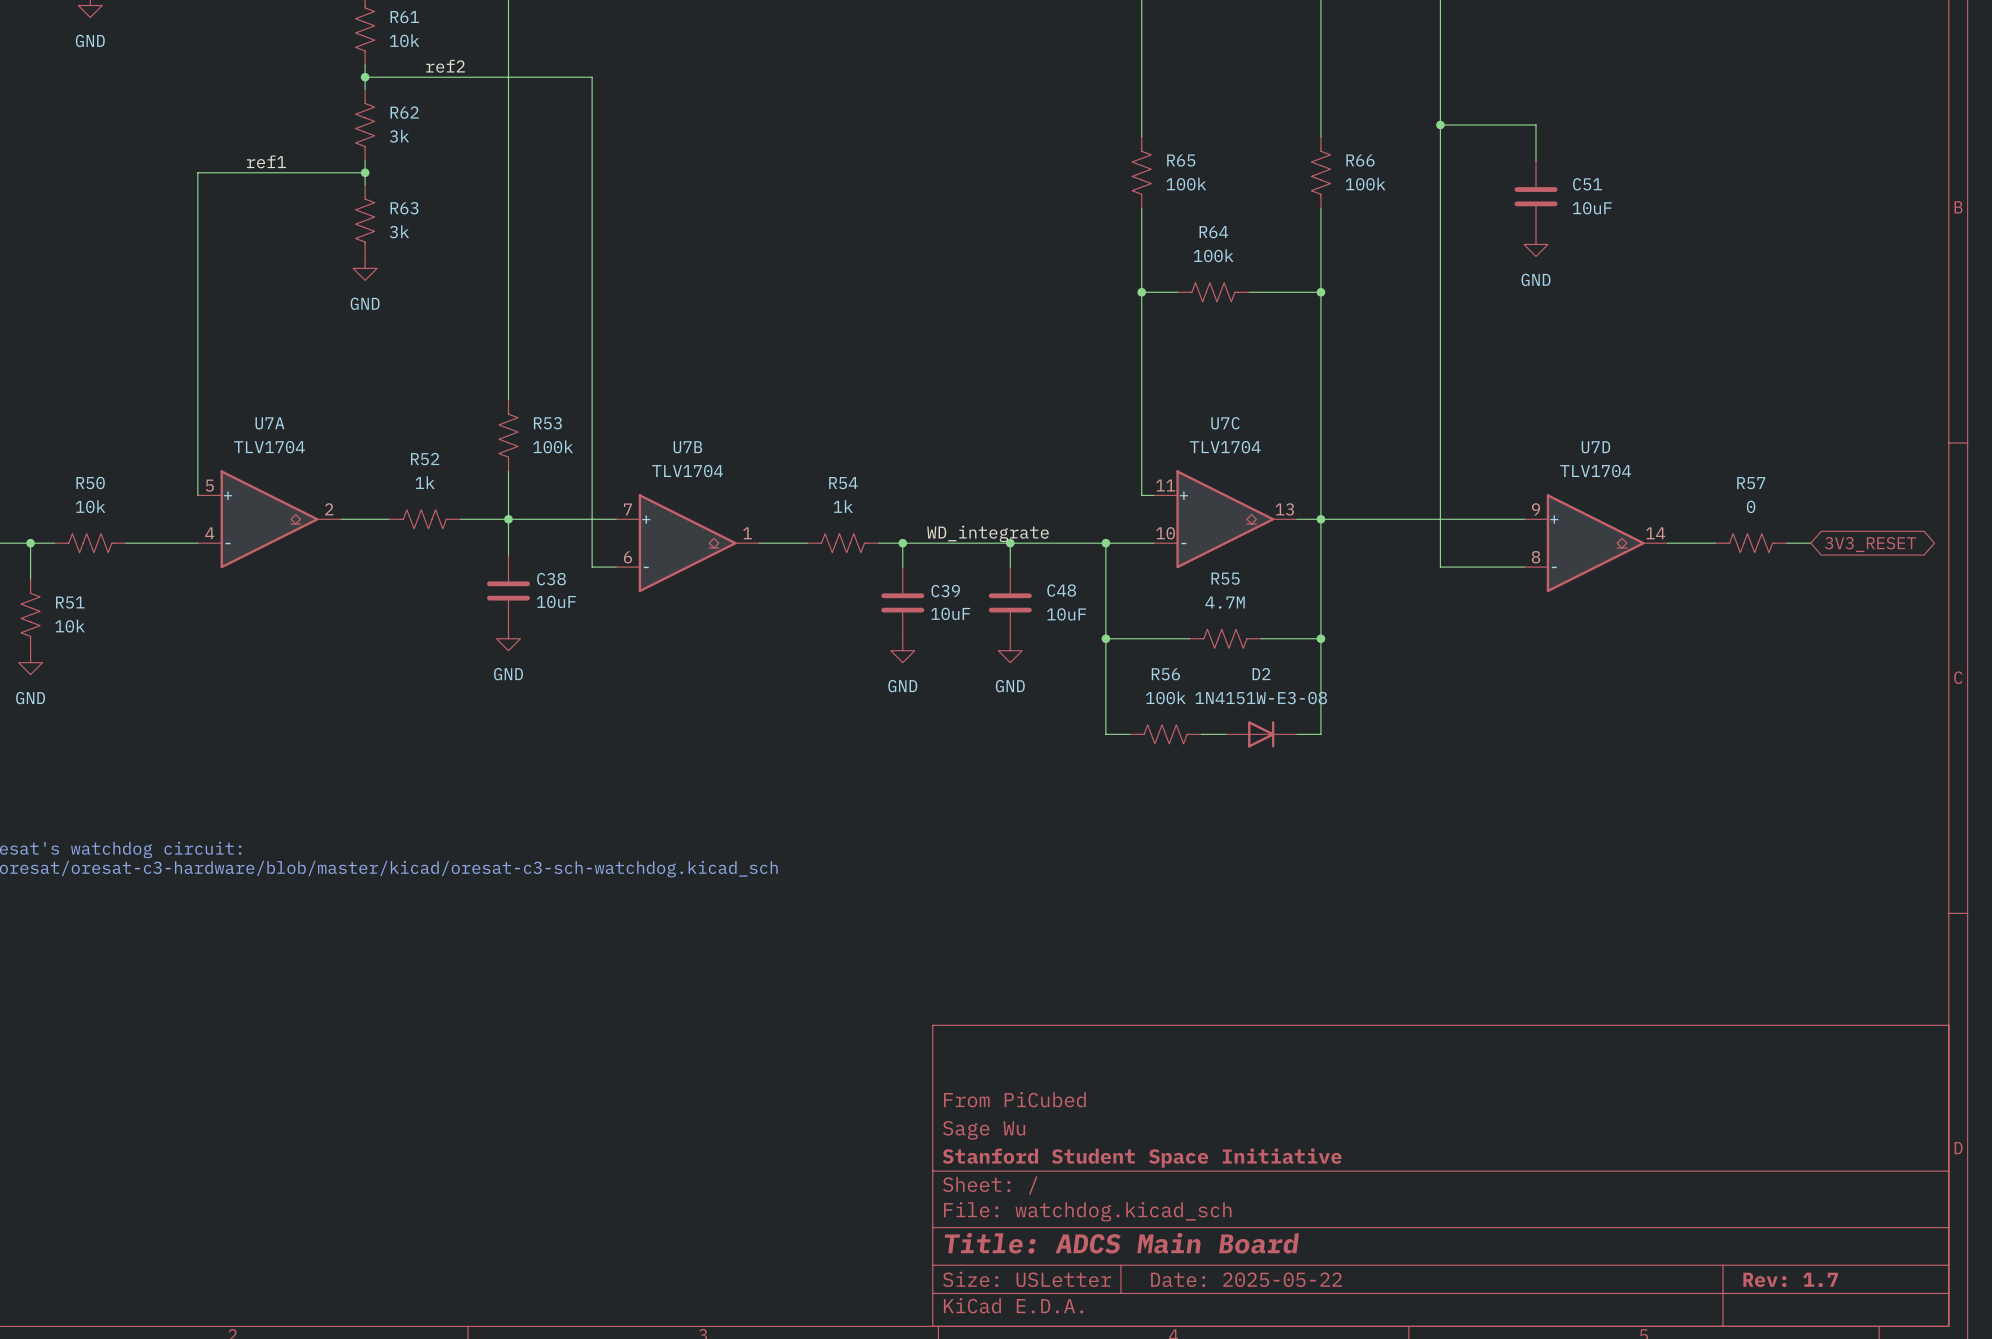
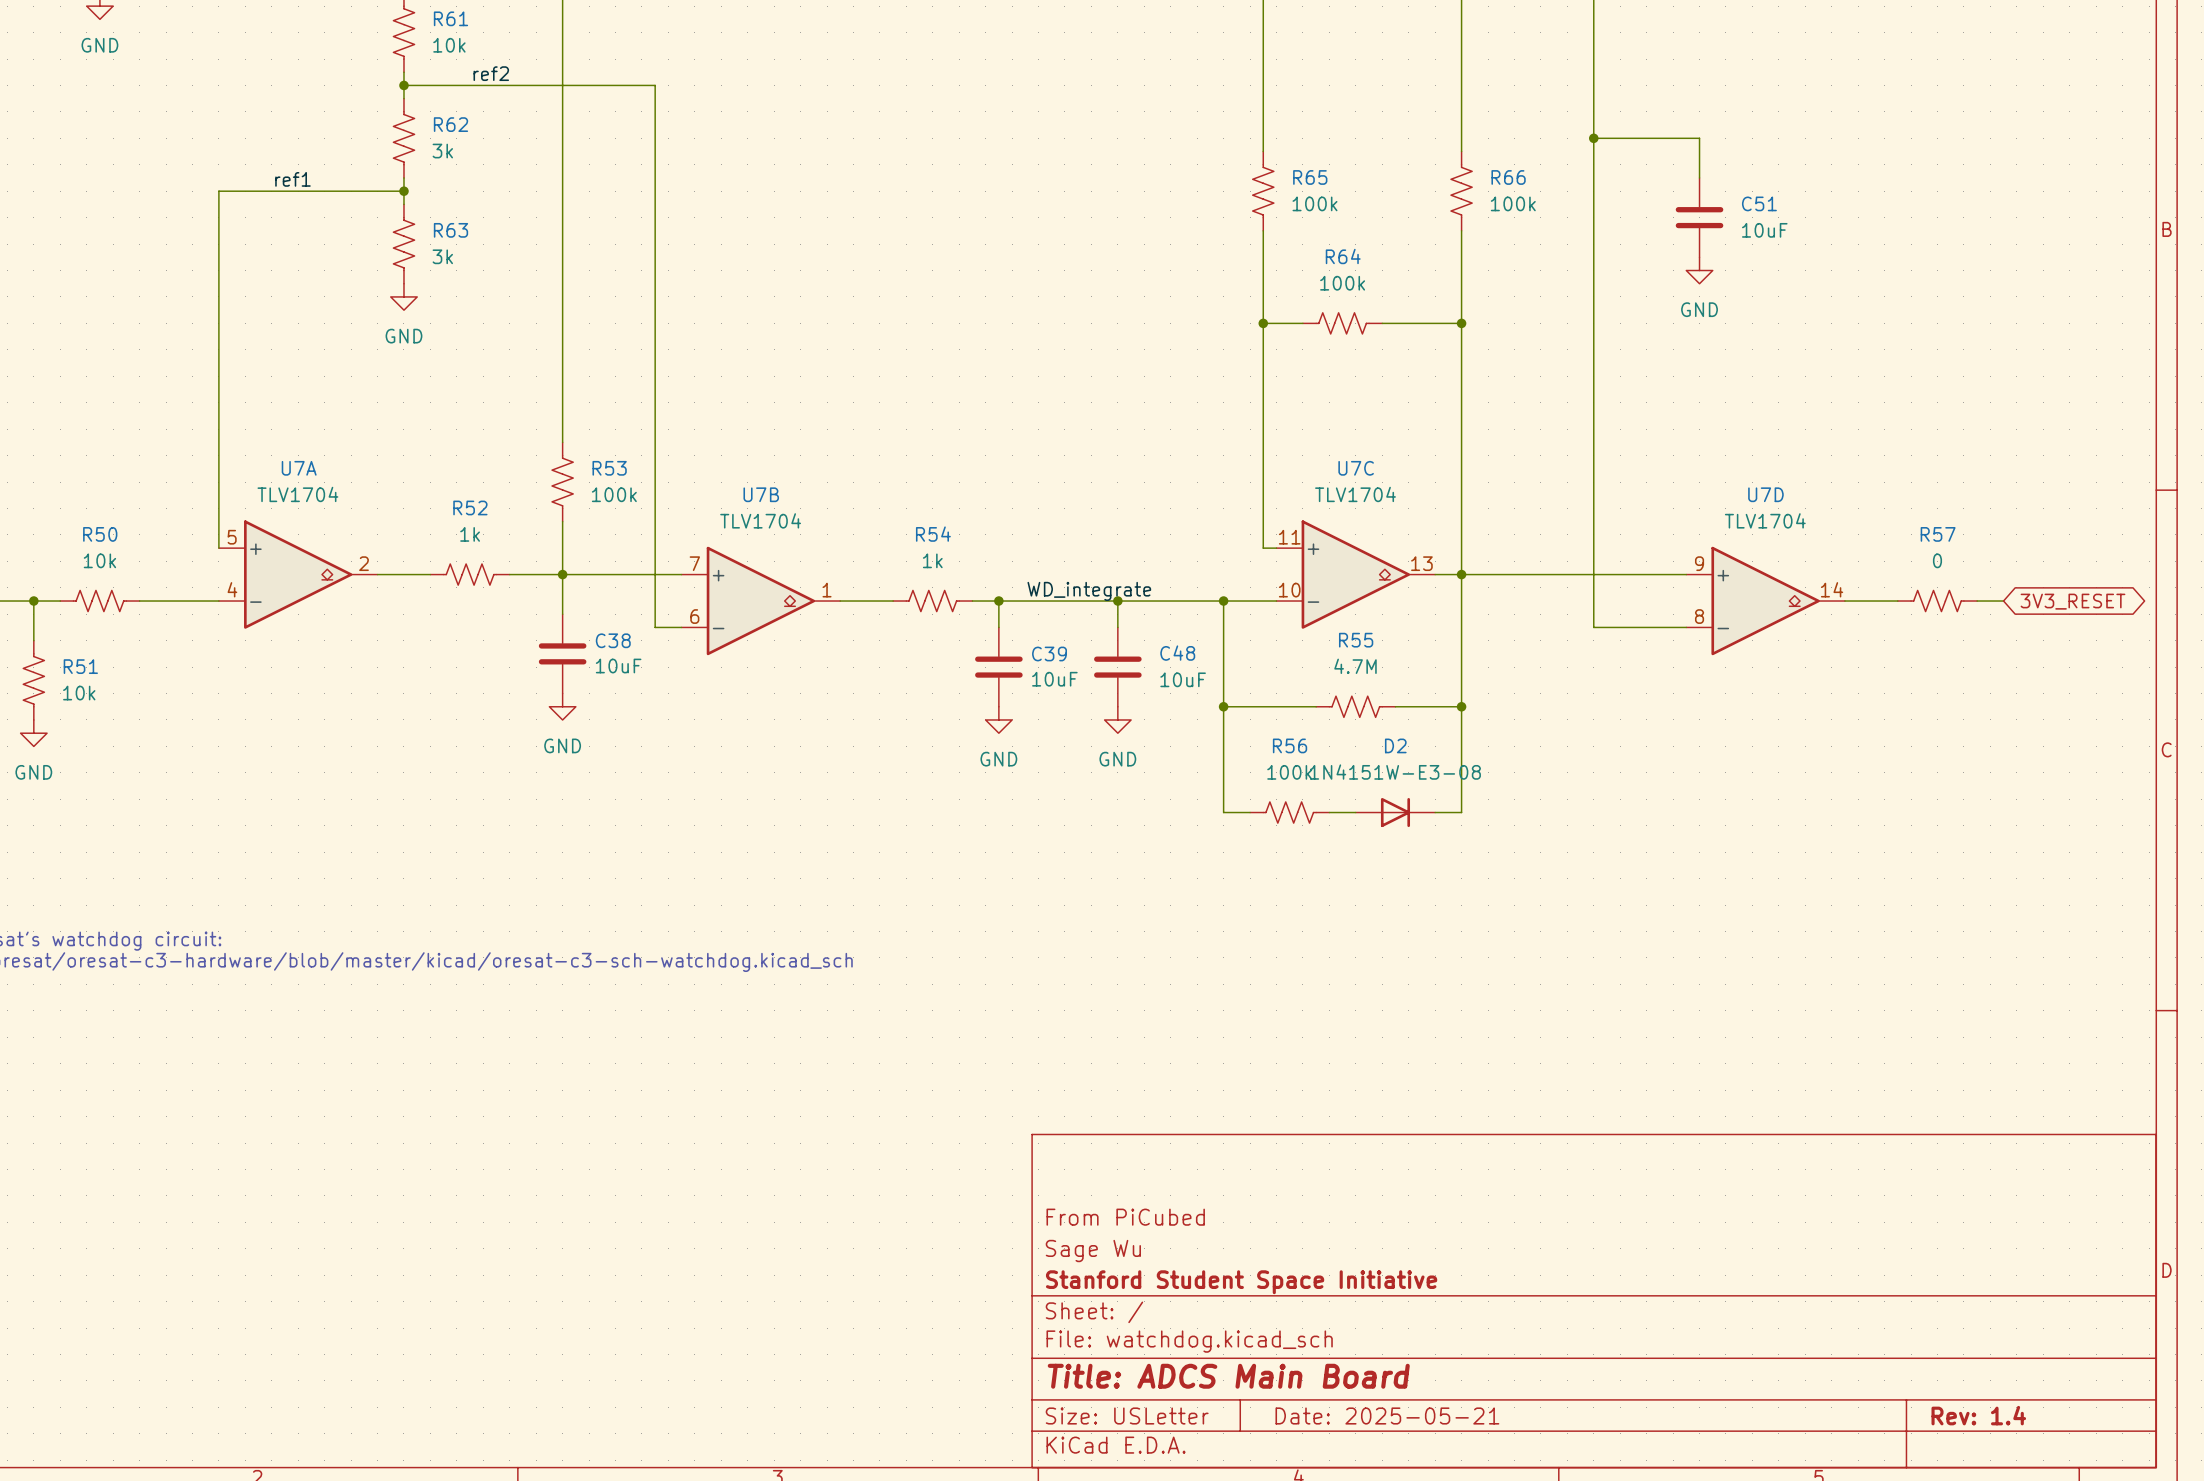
title block: Date: 2025-05-22 (1246, 1279) -> Date: 2025-05-21 (1387, 1415)
title block: Rev: 1.7 (1790, 1279) -> Rev: 1.4 (1978, 1415)

